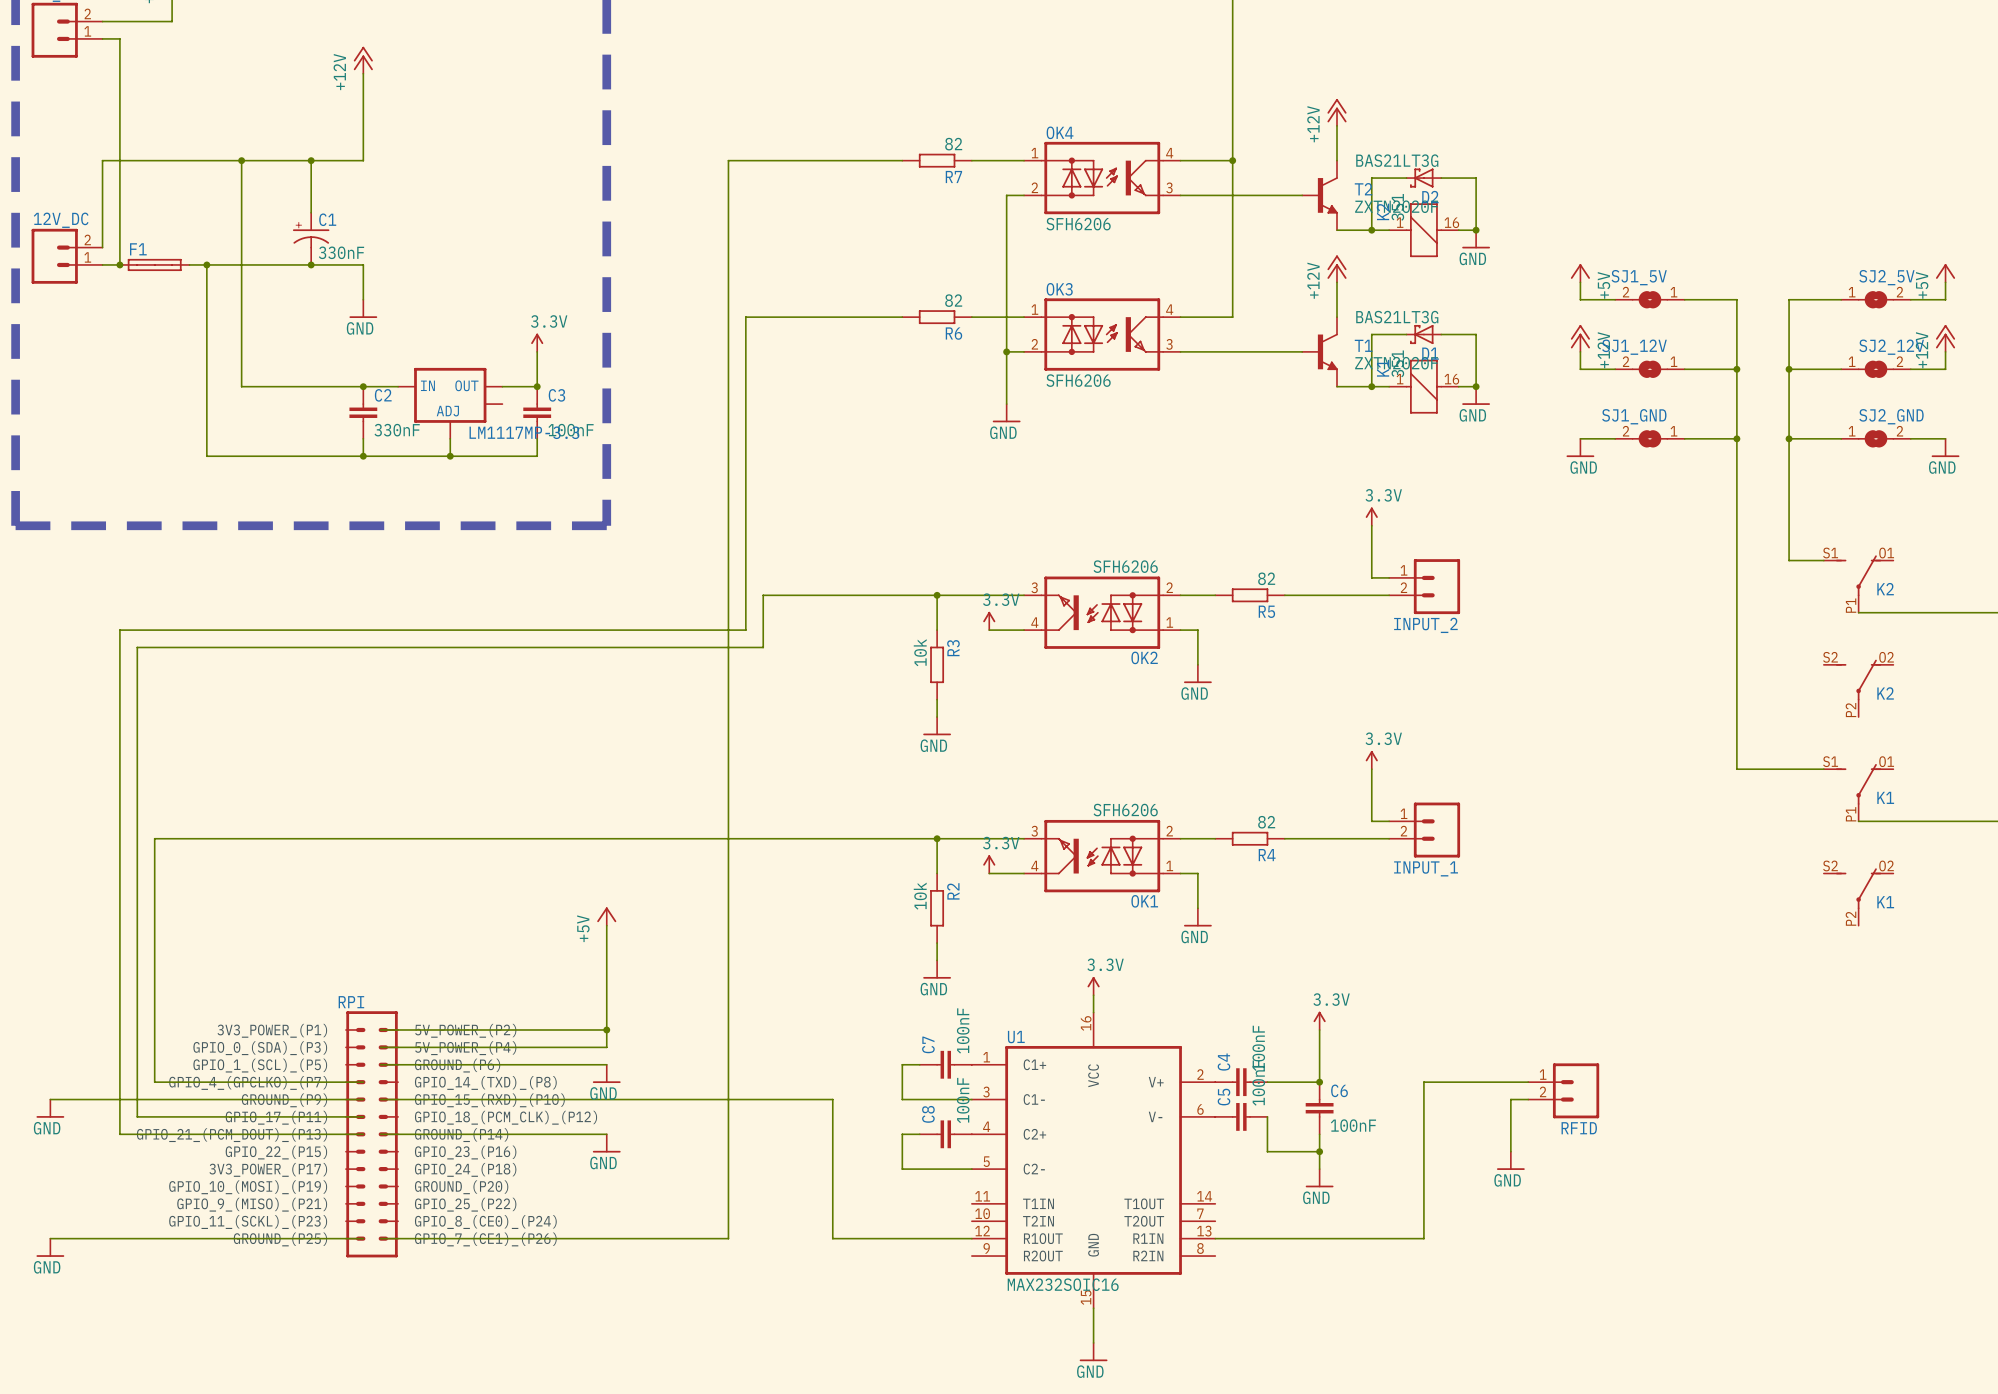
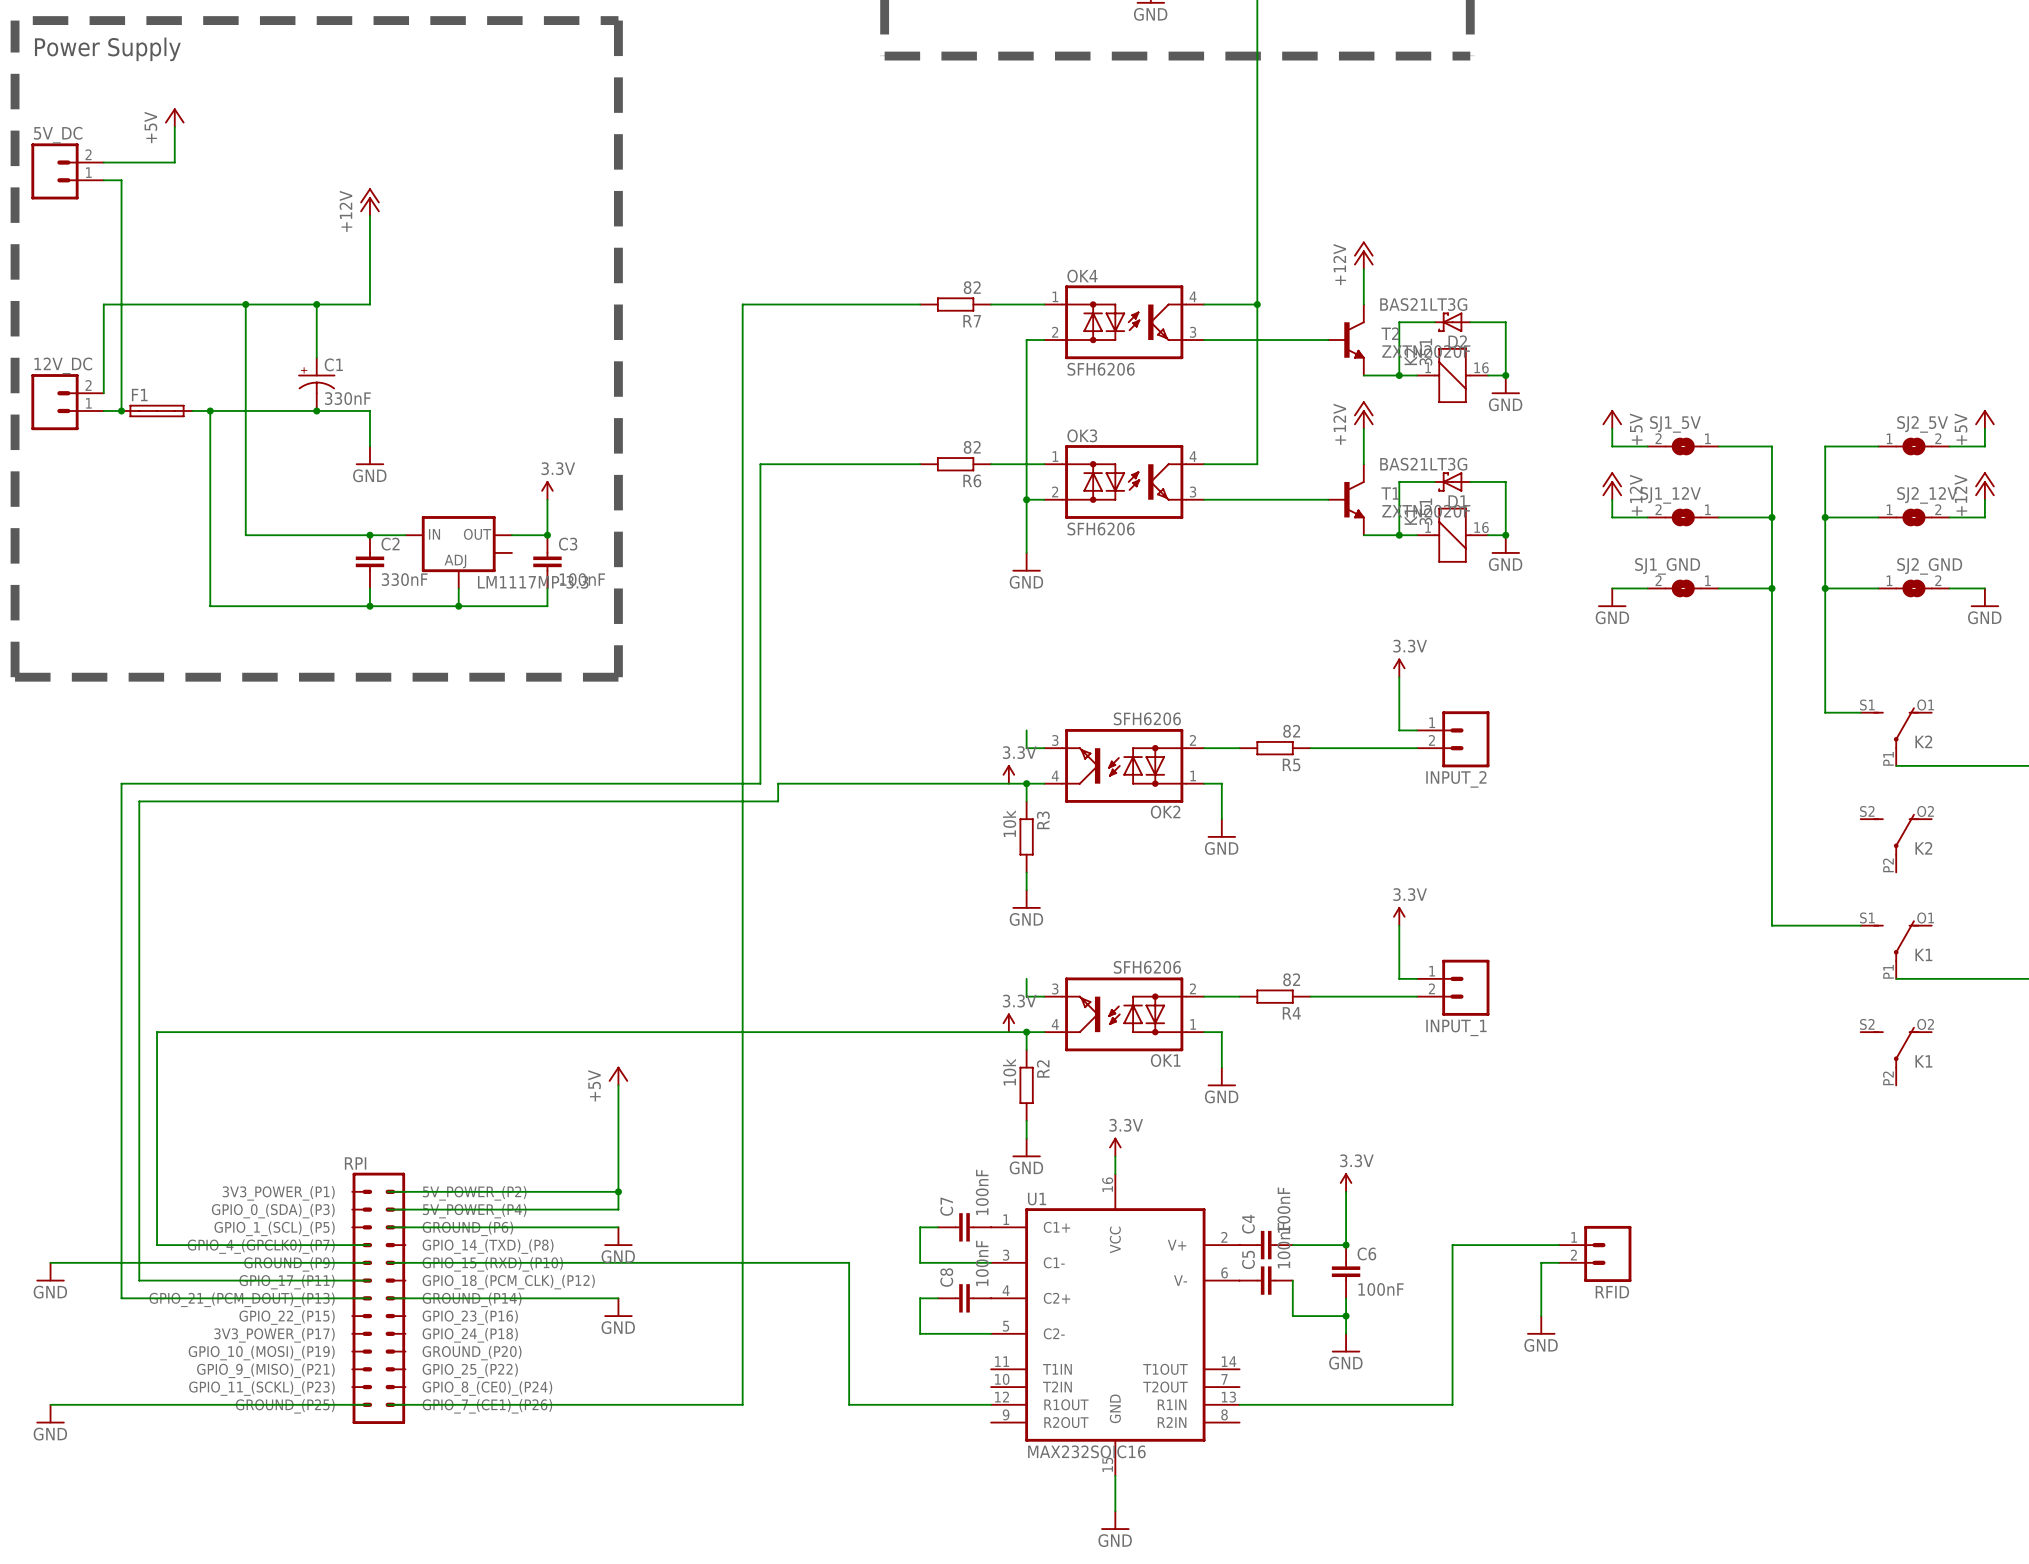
wire: none -> (1026, 730) (1026, 748)
wire: (937, 595) (937, 630) -> none
junction: (937, 595) -> none
wire: (1006, 595) (763, 595) (763, 630) -> (1008, 783) (778, 783)
wire: none -> (1026, 783) (1026, 801)
junction: none -> (1026, 783)
R3 position: (937, 664) -> (1026, 836)
wire: (937, 699) (937, 717) -> (1026, 872) (1026, 890)
power symbol position: GND (937, 726) -> GND (1026, 899)
wire: none -> (1026, 978) (1026, 996)
wire: (937, 838) (937, 873) -> none
junction: (937, 838) -> none
wire: (1006, 838) (154, 838) (154, 873) -> (1008, 1032) (157, 1032)
wire: none -> (1026, 1032) (1026, 1049)
junction: none -> (1026, 1032)
R2 position: (937, 908) -> (1026, 1085)
wire: (937, 943) (937, 960) -> (1026, 1120) (1026, 1138)
power symbol position: GND (937, 969) -> GND (1026, 1147)

